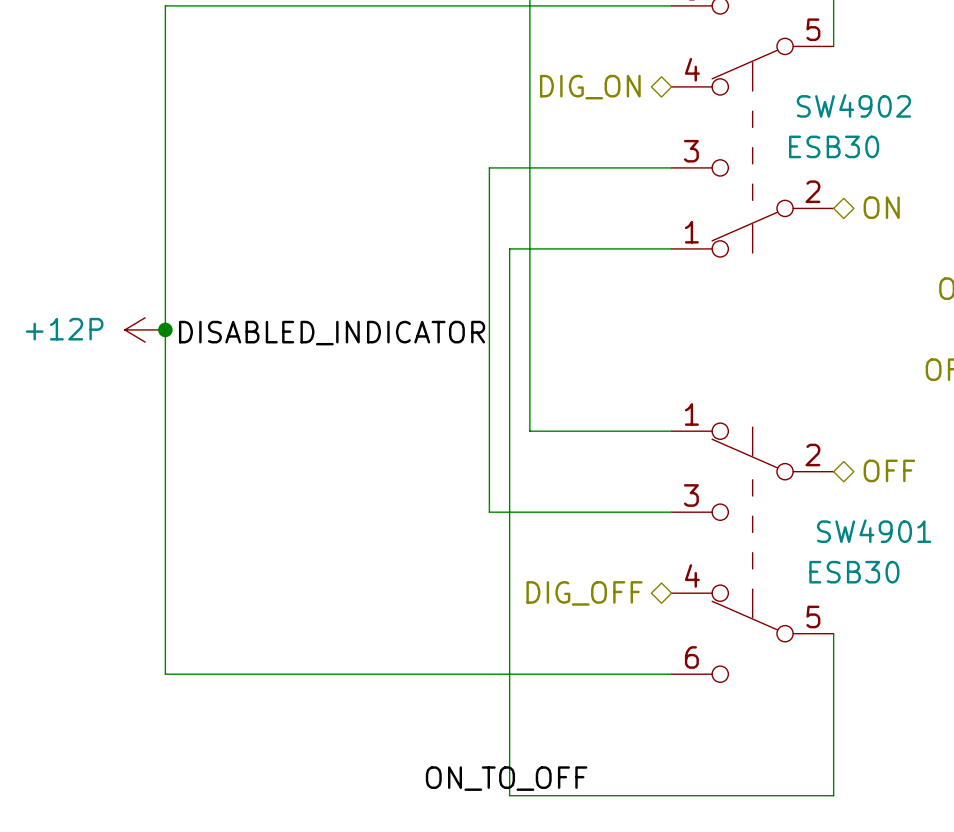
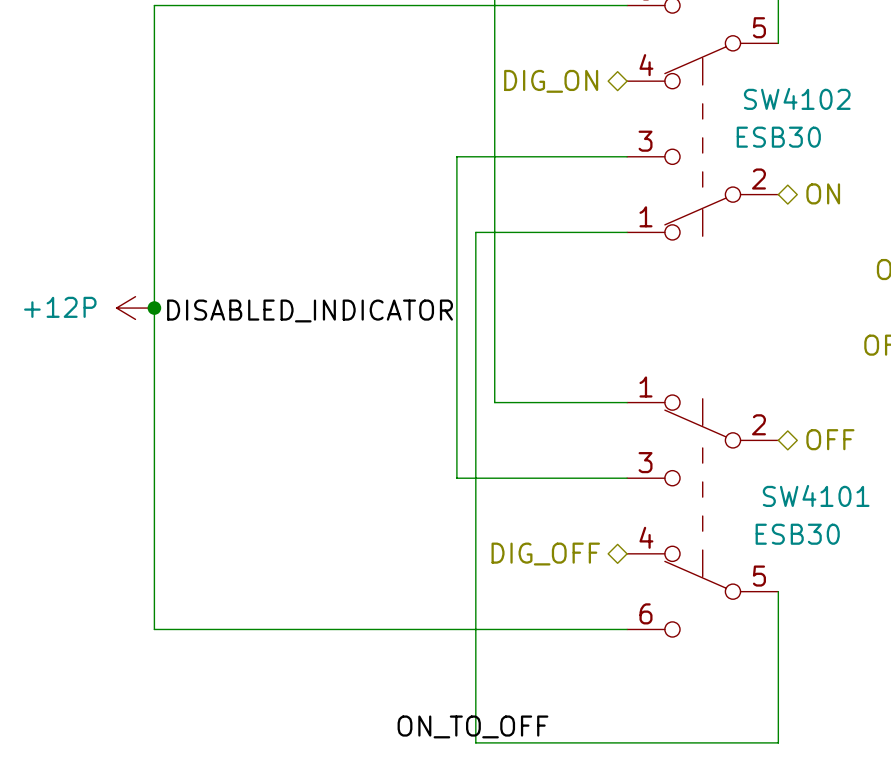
SW4902 name: SW4902 (853, 105) -> SW4102 (797, 98)
SW4901 name: SW4901 (874, 531) -> SW4101 (816, 495)

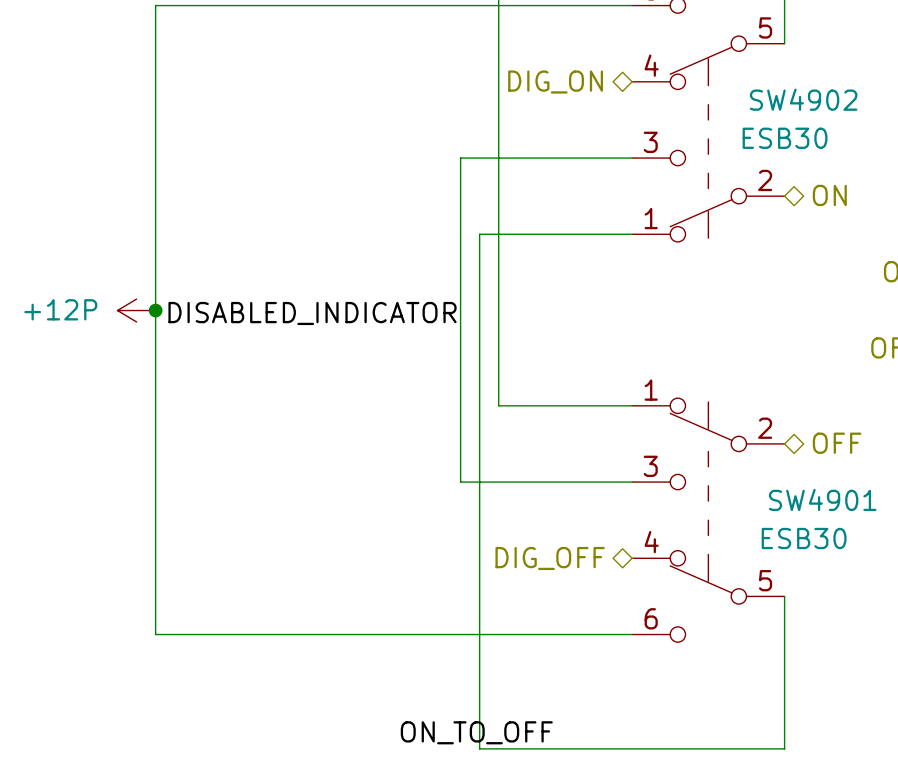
SW4102 name: SW4102 (797, 98) -> SW4902 (803, 99)
SW4101 name: SW4101 (816, 495) -> SW4901 (822, 499)

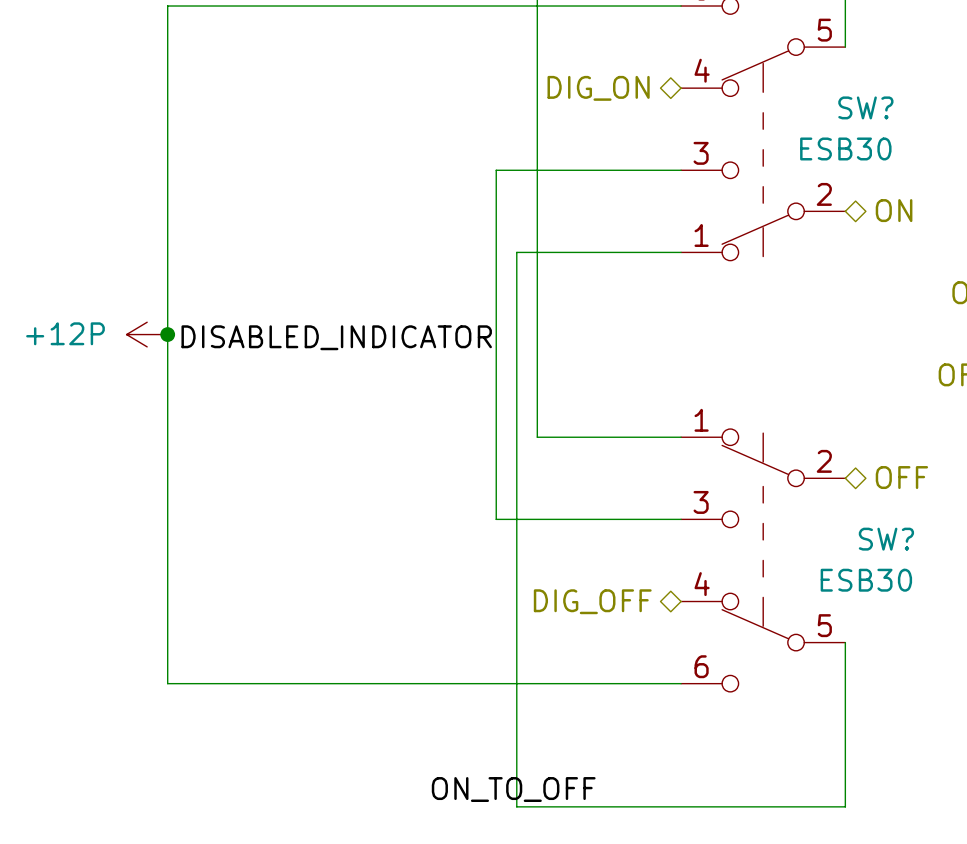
SW4902 name: SW4902 (803, 99) -> SW? (865, 107)
SW4901 name: SW4901 (822, 499) -> SW? (886, 539)

